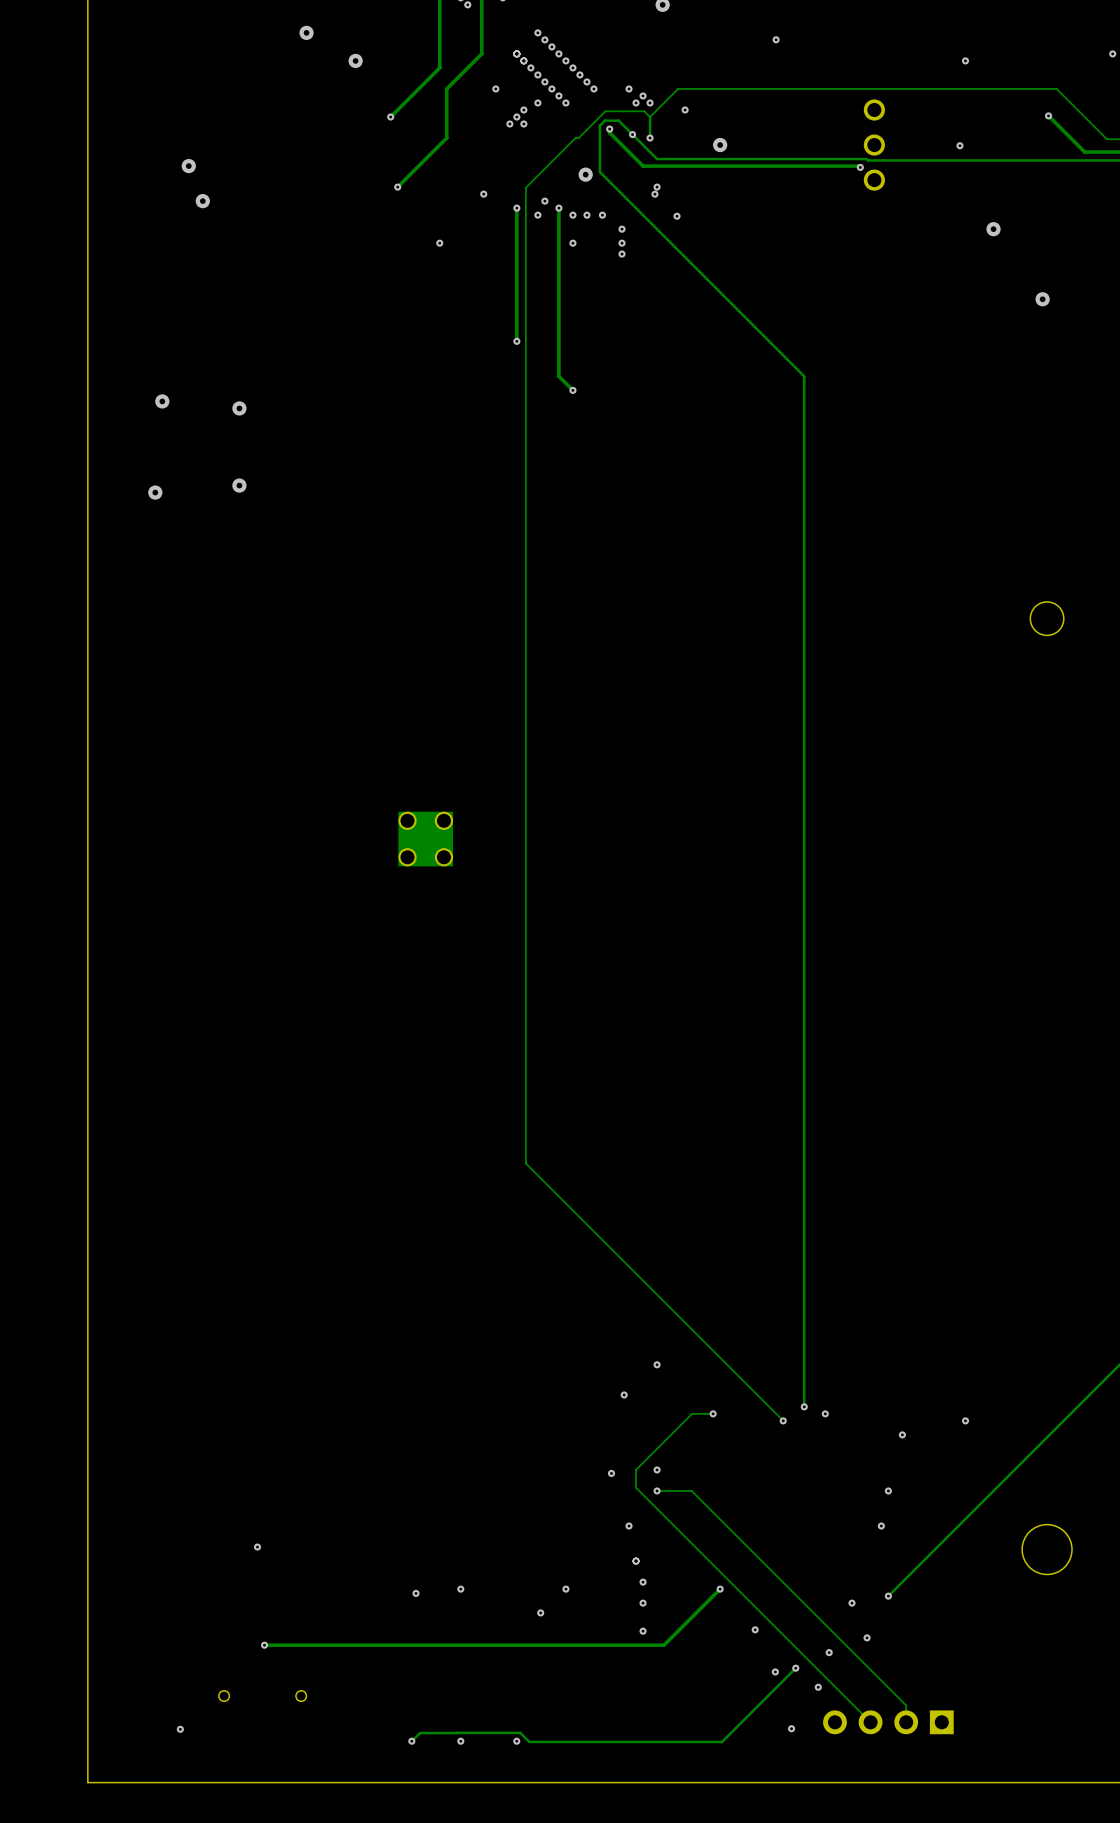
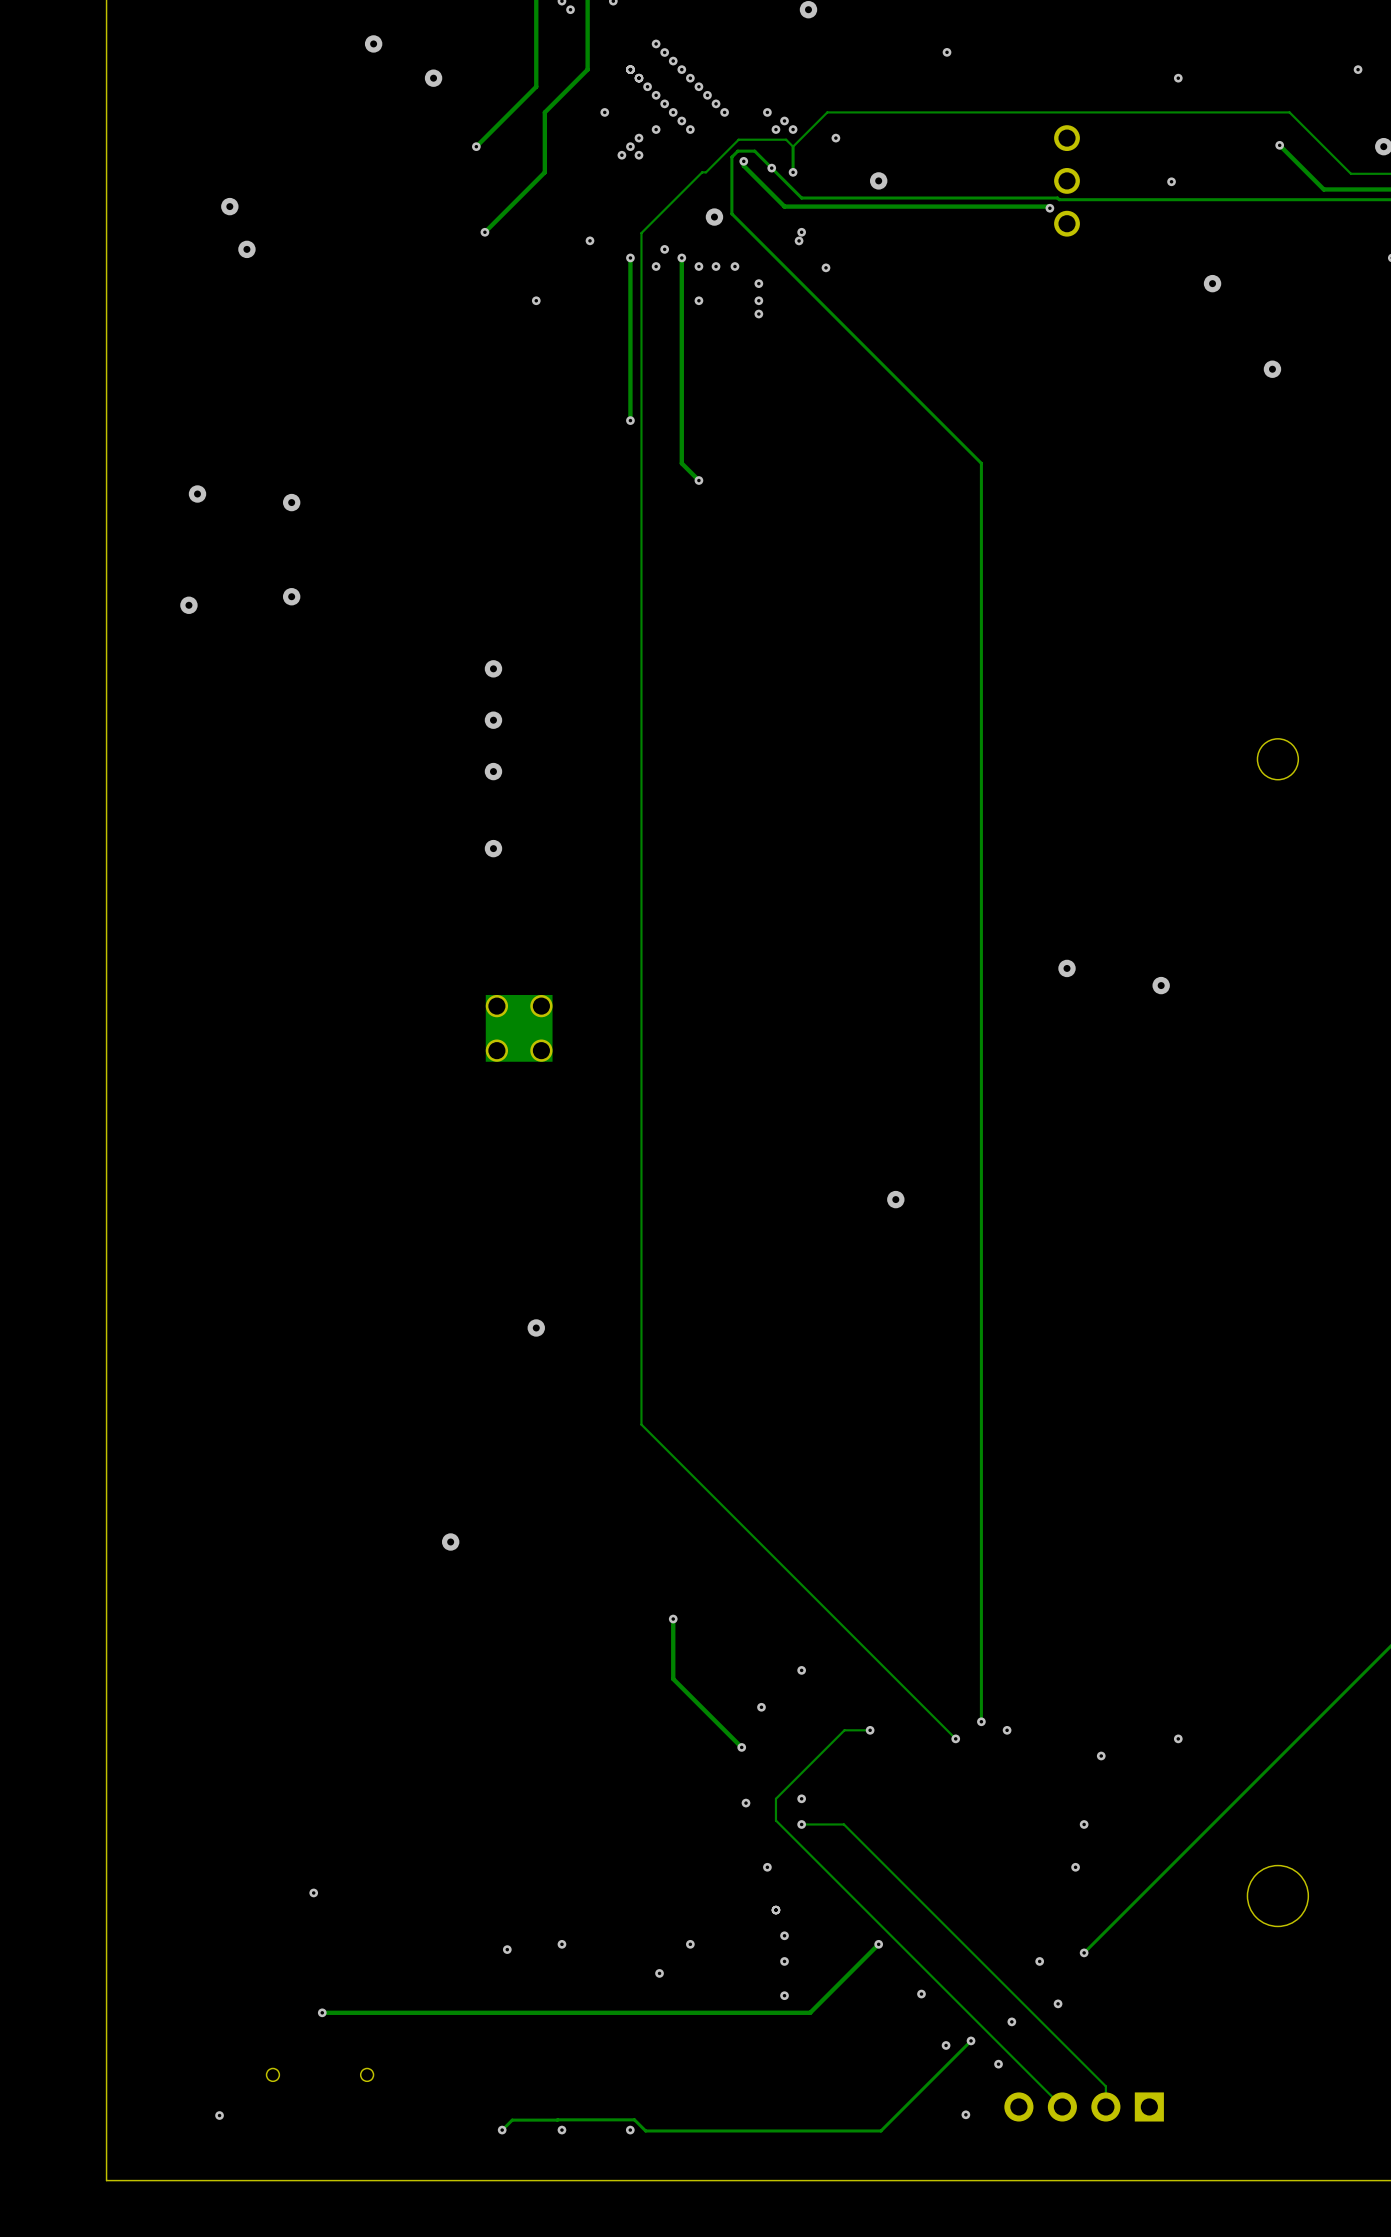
via: none -> (493, 668)
via: none -> (493, 720)
via: none -> (493, 771)
via: none -> (493, 848)
via: none -> (1067, 968)
via: none -> (1161, 985)
via: none -> (895, 1199)
via: none -> (536, 1327)
via: none -> (450, 1541)
track: none -> (673, 1619) (673, 1678) (741, 1747)
via: none -> (673, 1619)
via: none -> (741, 1747)

